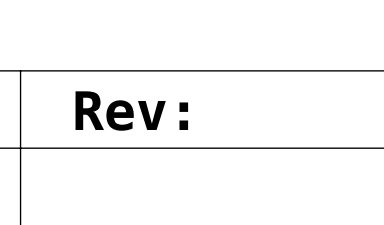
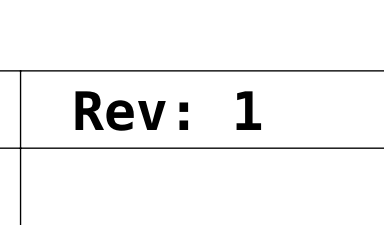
title block: Rev: (131, 111) -> Rev: 1 (168, 111)

